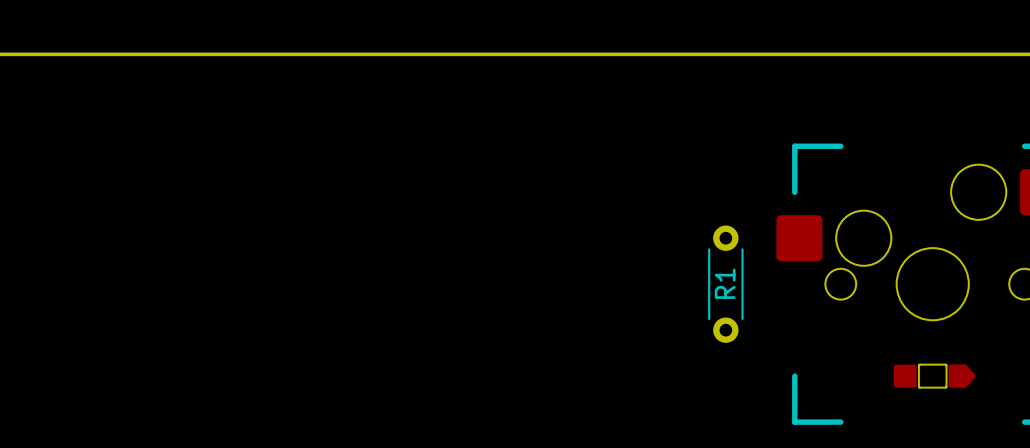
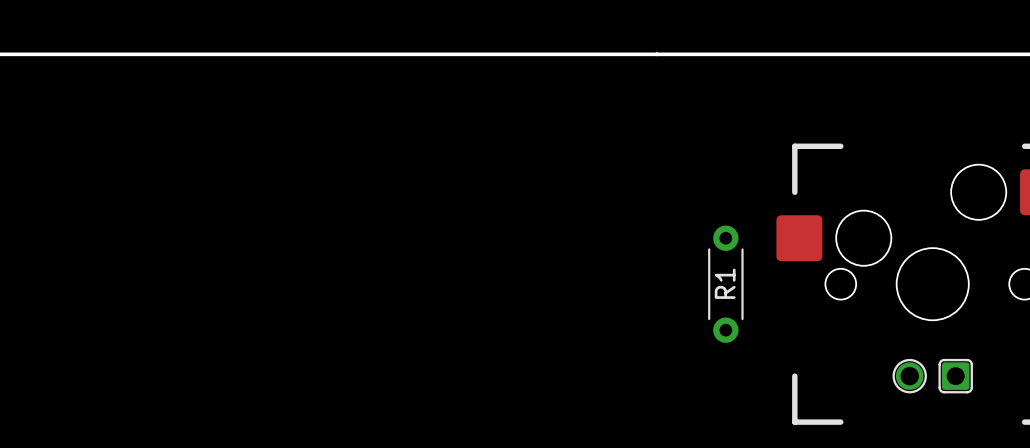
part footprint: [893, 364, 976, 388] -> [892, 358, 973, 394]

